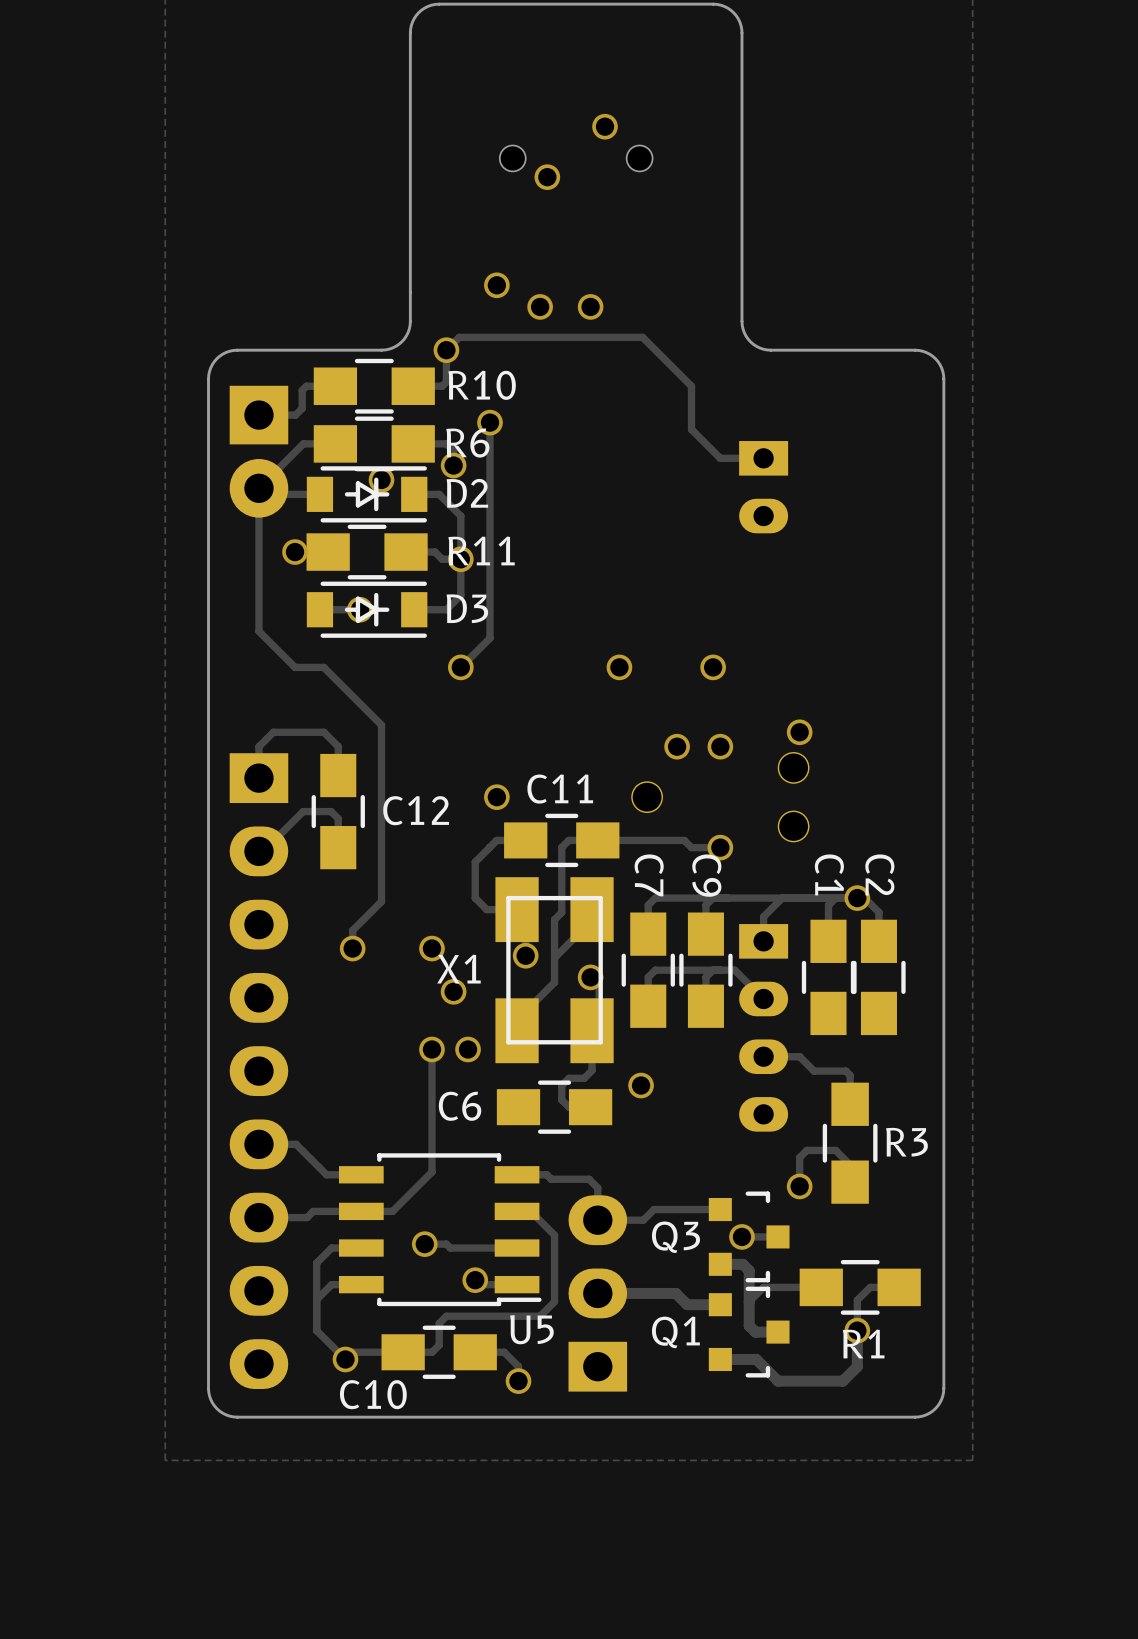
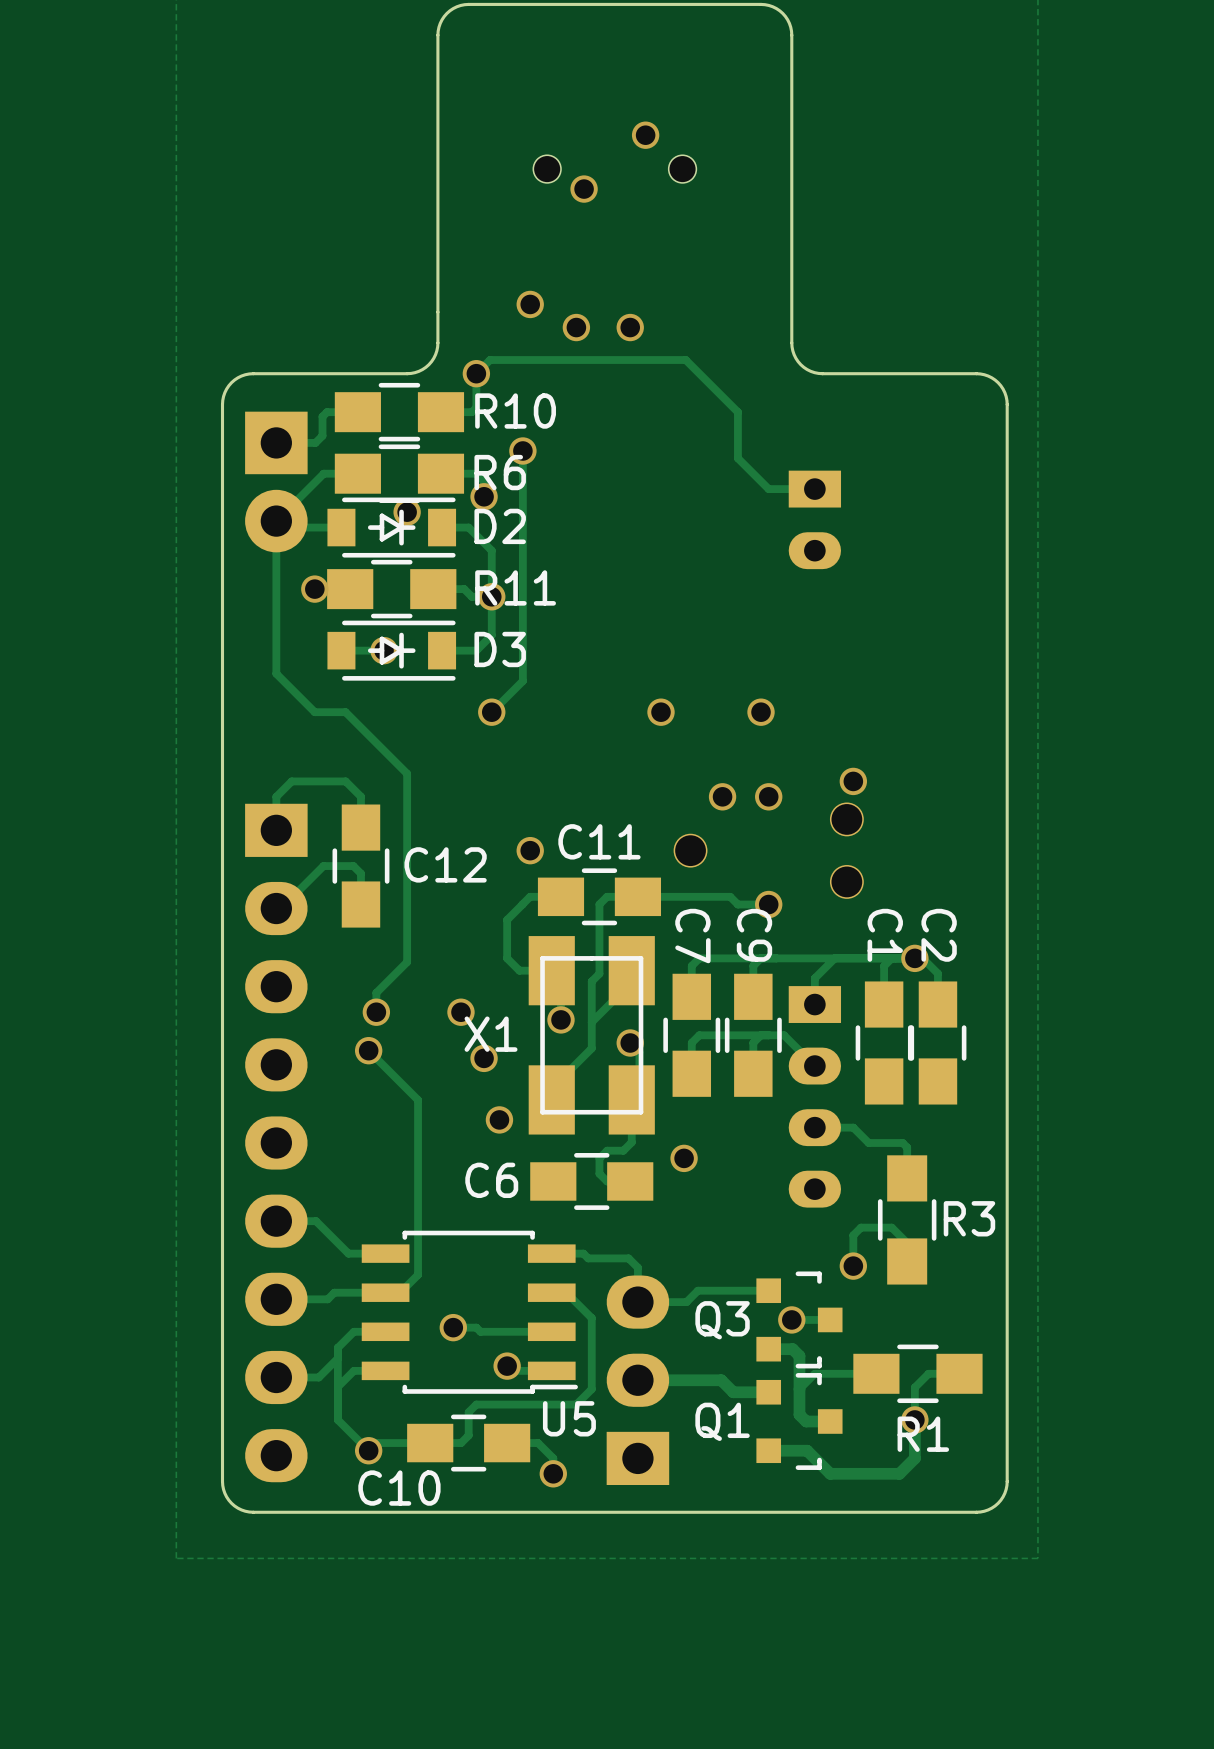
track: (431, 1049) (431, 1172) (392, 1211) (375, 1211) -> (368, 1050) (418, 1100) (418, 1274) (400, 1292)
via position: (431, 1049) -> (368, 1050)
track: none -> (337, 1358) (318, 1377) (276, 1377)

